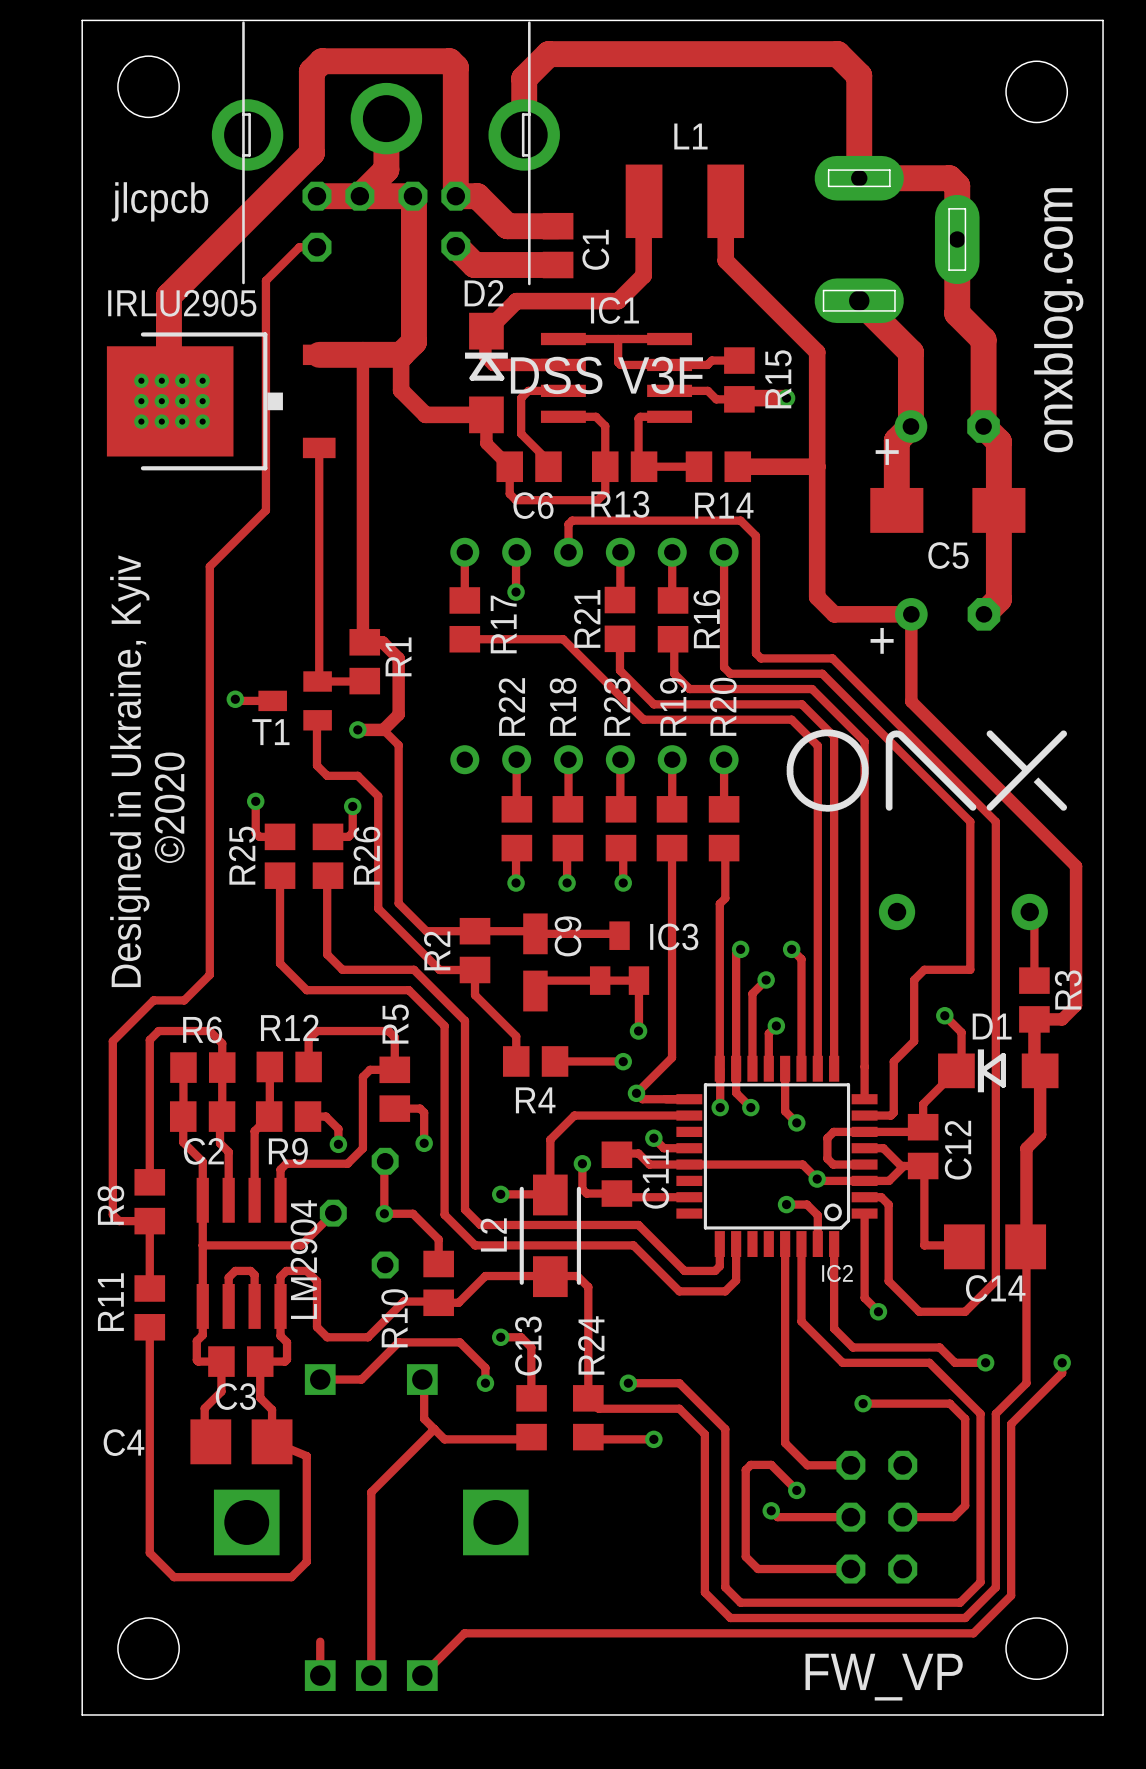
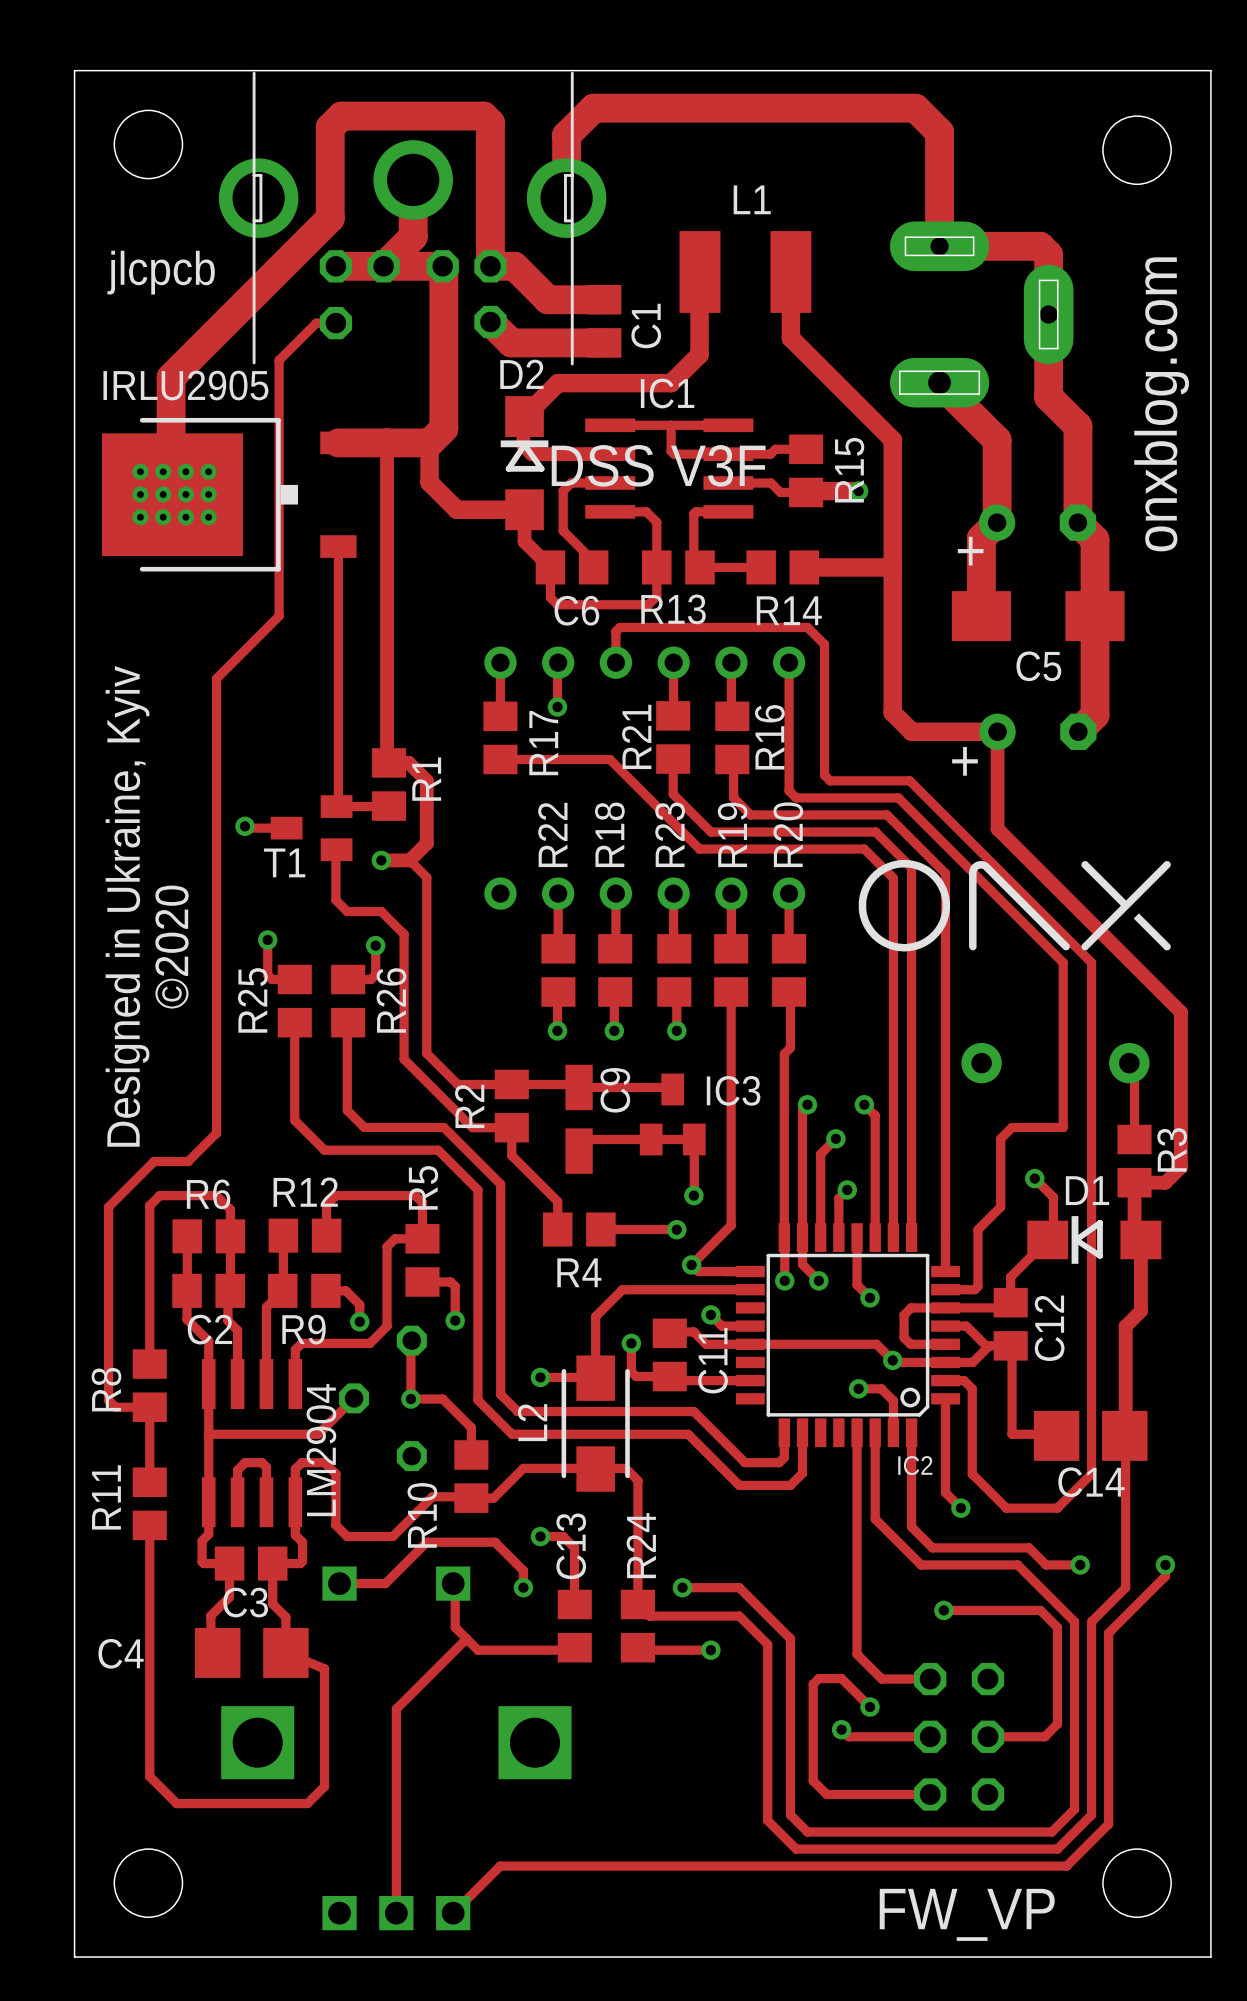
track: (320, 1641) (320, 1675) -> none

